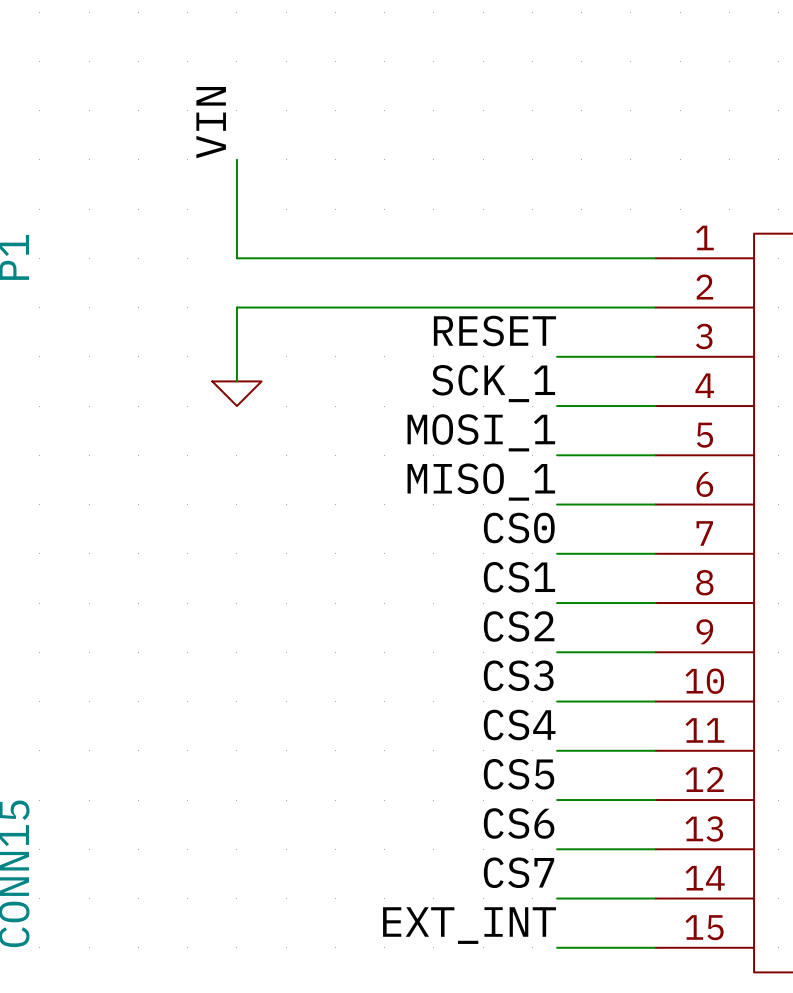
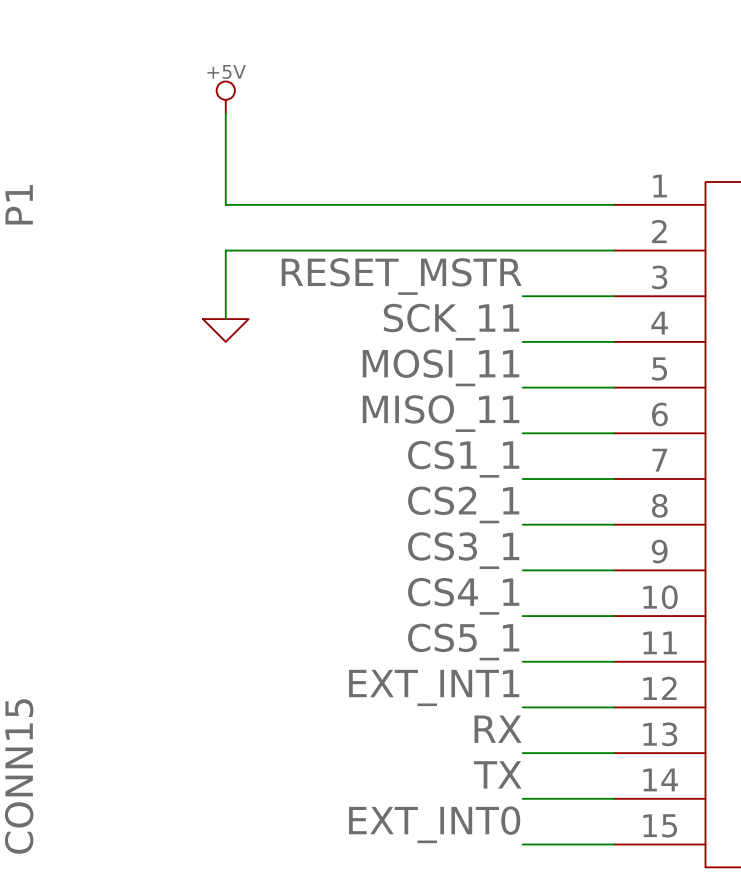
label: VIN (211, 122) -> none
power symbol: none -> +5V (225, 97)
label: RESET (494, 331) -> RESET_MSTR (401, 276)
label: SCK_1 (493, 383) -> SCK_11 (451, 322)
label: MOSI_1 (481, 432) -> MOSI_11 (441, 367)
label: MISO_1 (481, 482) -> MISO_11 (441, 413)
label: CS0 (519, 528) -> CS1_1 (463, 459)
label: CS1 (519, 577) -> CS2_1 (463, 504)
label: CS2 (519, 626) -> CS3_1 (463, 550)
label: CS3 (518, 675) -> CS4_1 (463, 596)
label: CS4 (519, 725) -> CS5_1 (463, 642)
label: CS5 (519, 774) -> EXT_INT1 (434, 687)
label: CS6 (519, 823) -> RX (498, 729)
label: CS7 (518, 872) -> TX (497, 774)
label: EXT_INT (469, 925) -> EXT_INT0 (434, 824)

